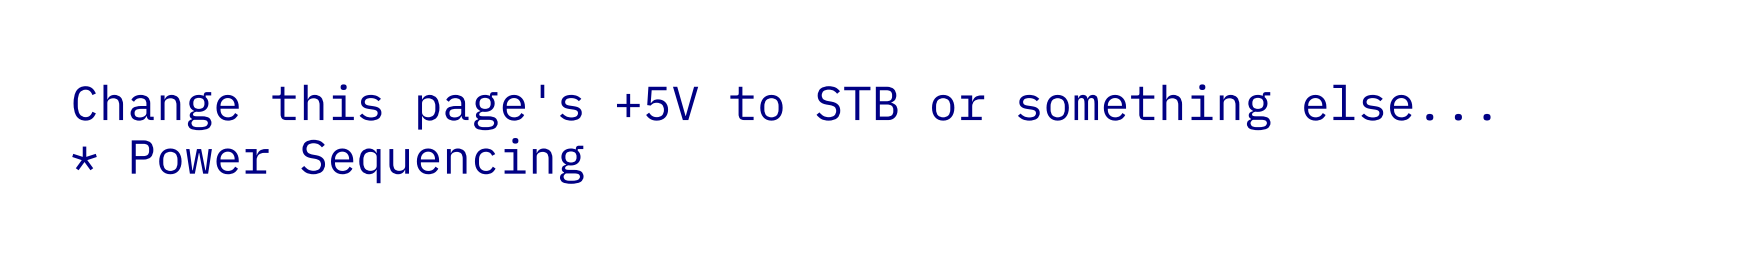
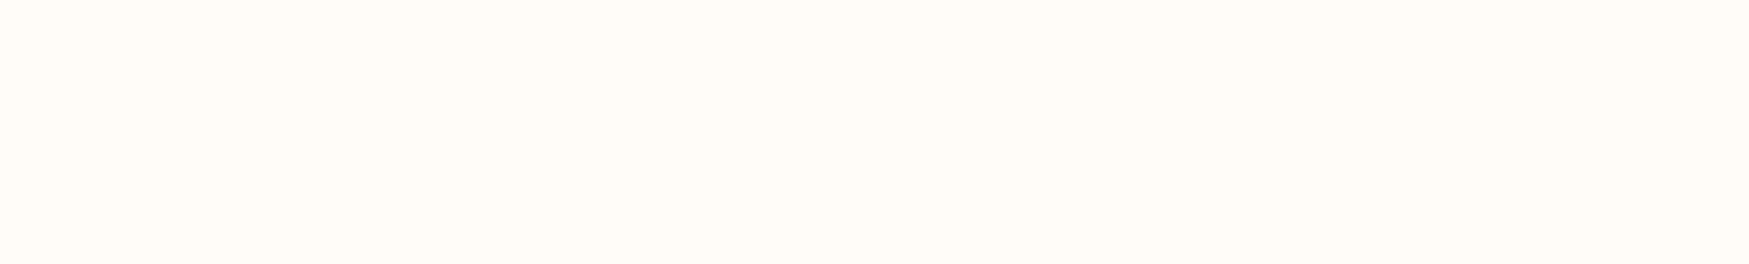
text: Change this page's +5V to STB or something else... (782, 107) -> none
text: * Power Sequencing (327, 160) -> none

